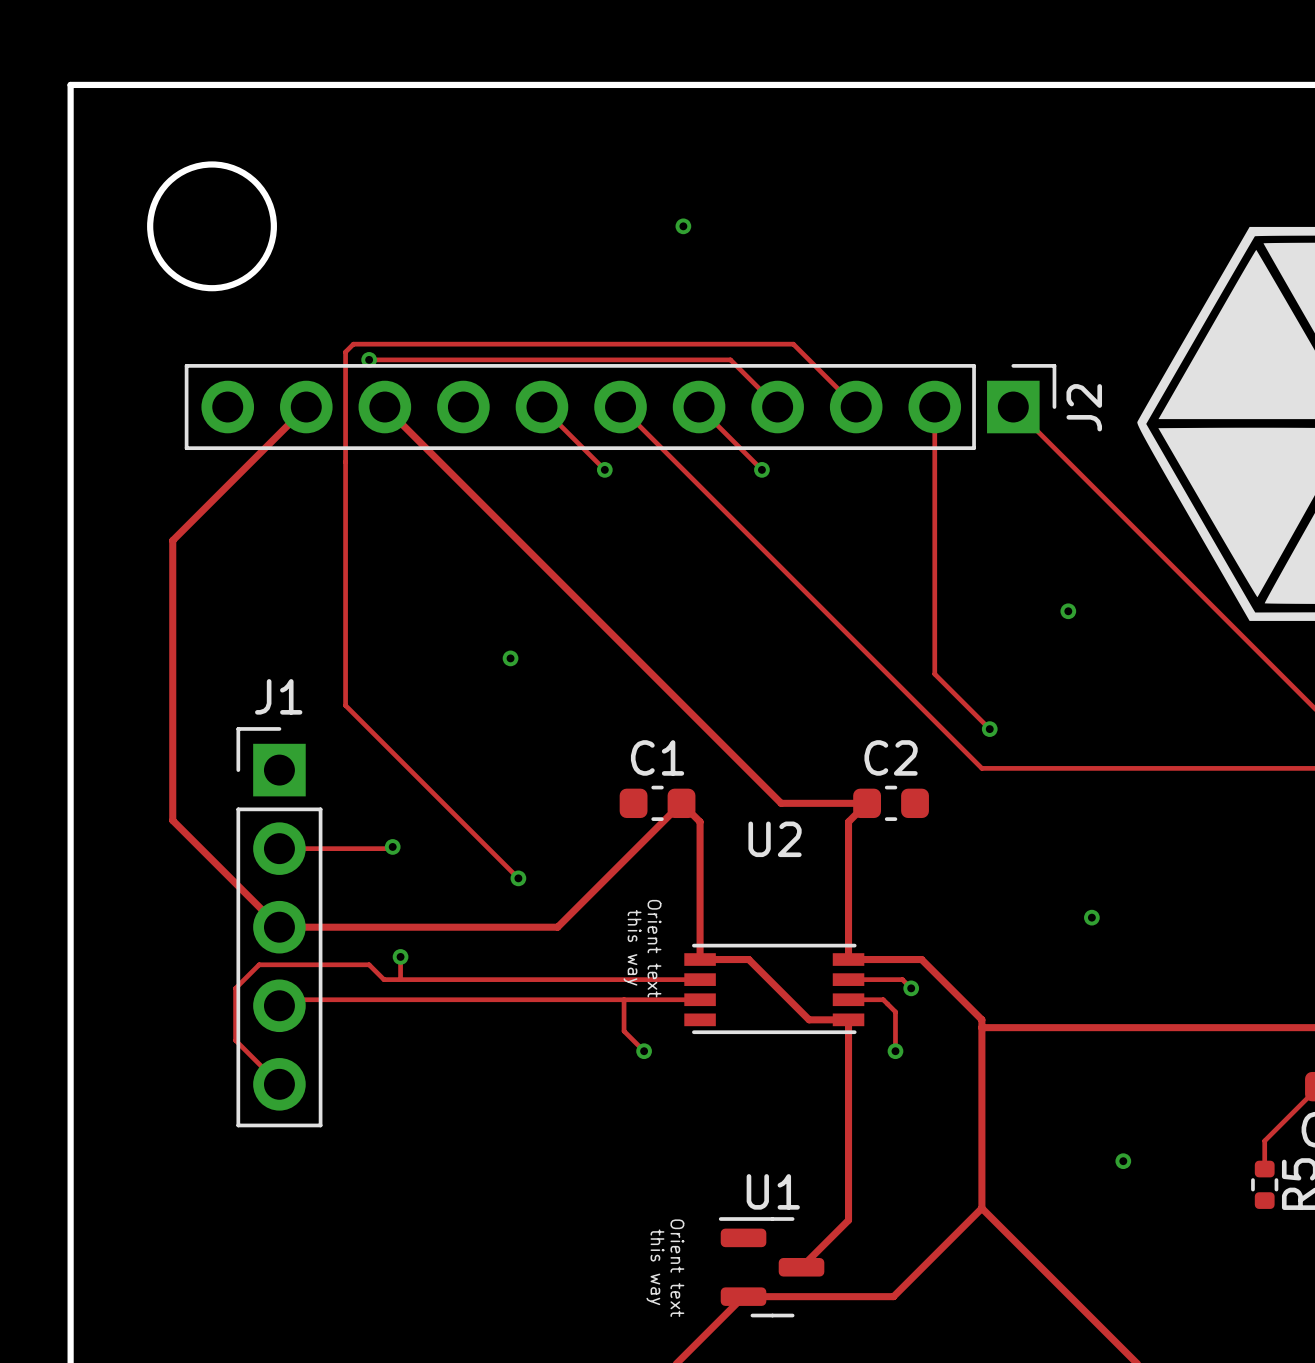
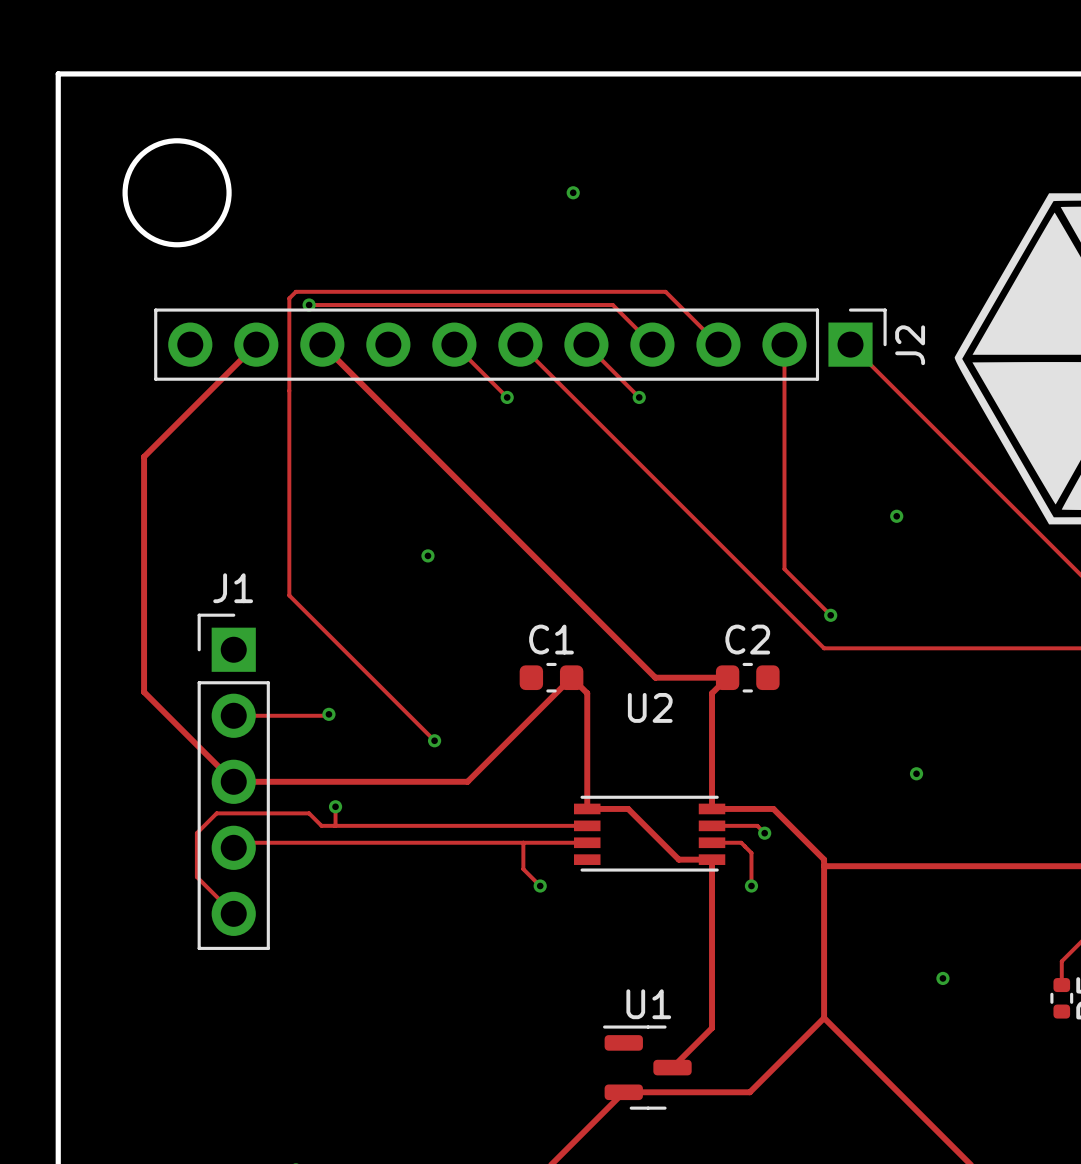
text: this way (632, 947) -> none
text: Orient text (654, 948) -> none
text: this way (655, 1267) -> none
text: Orient text (677, 1268) -> none

